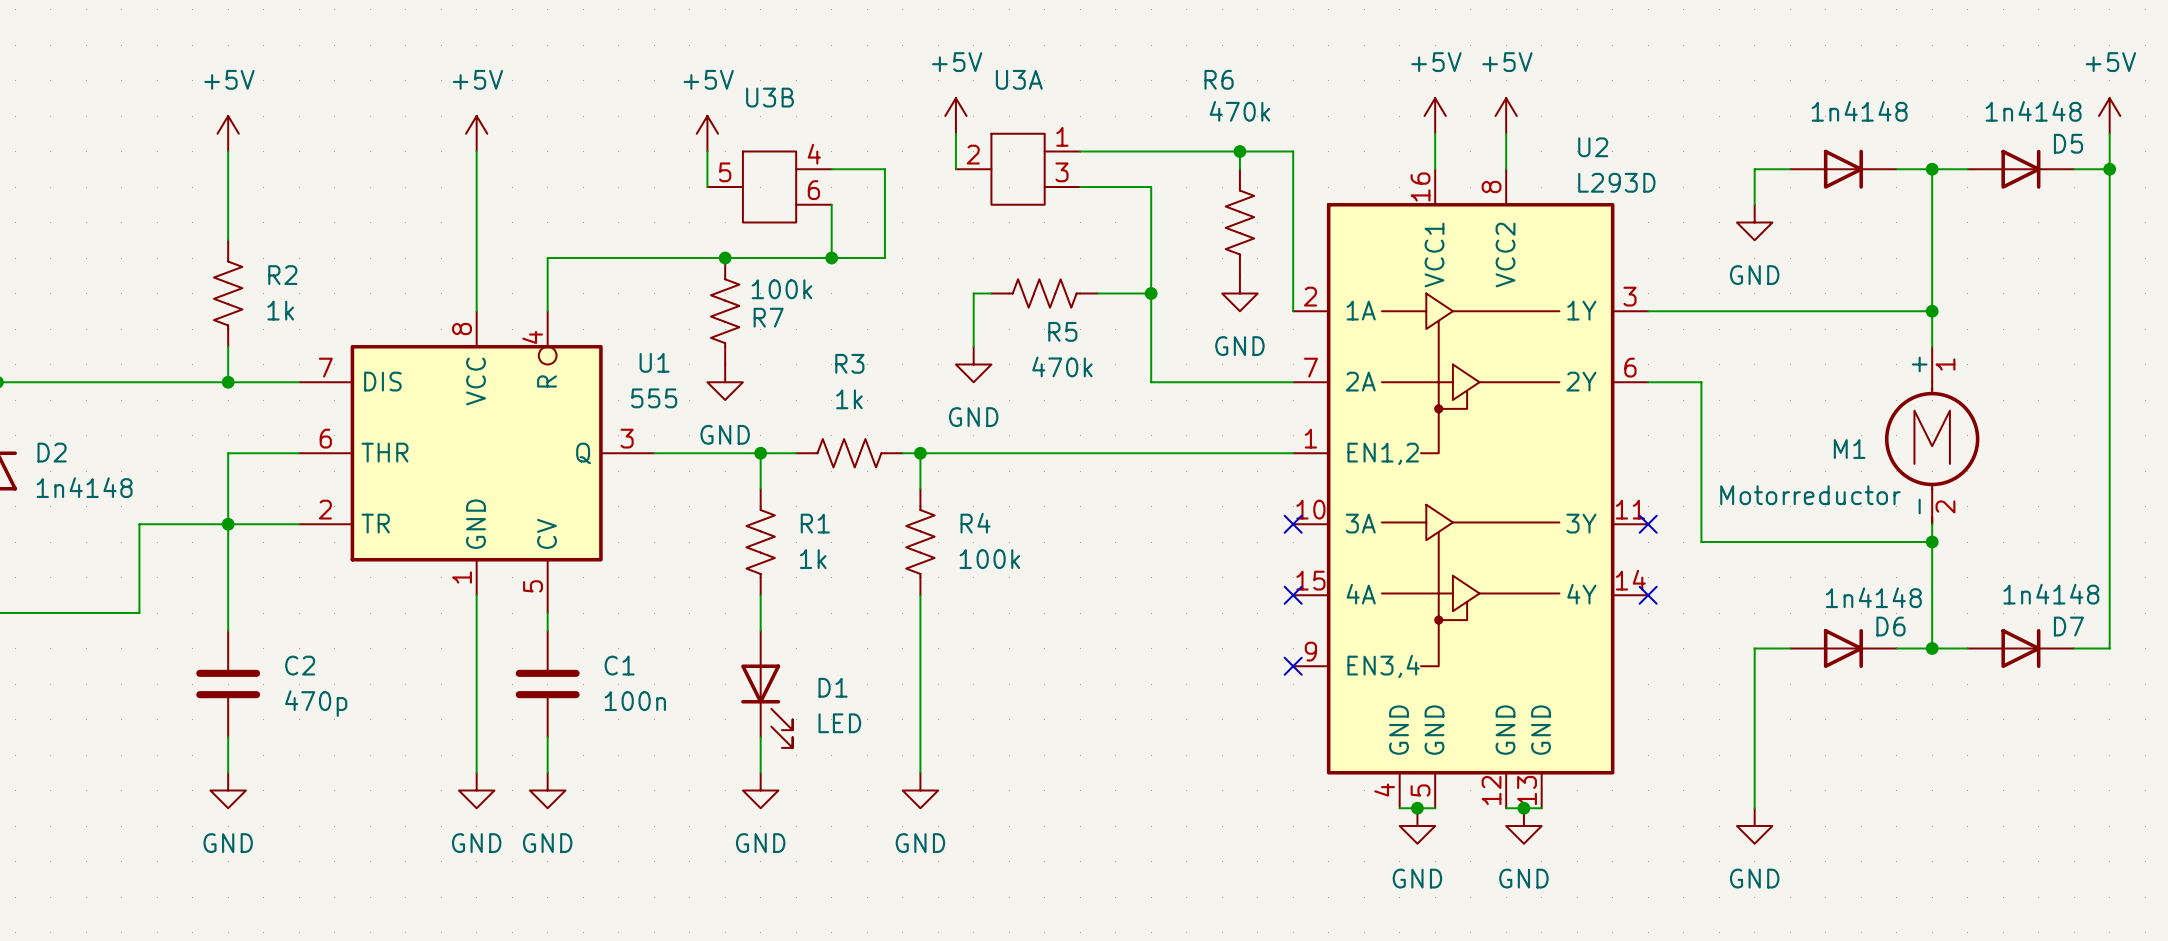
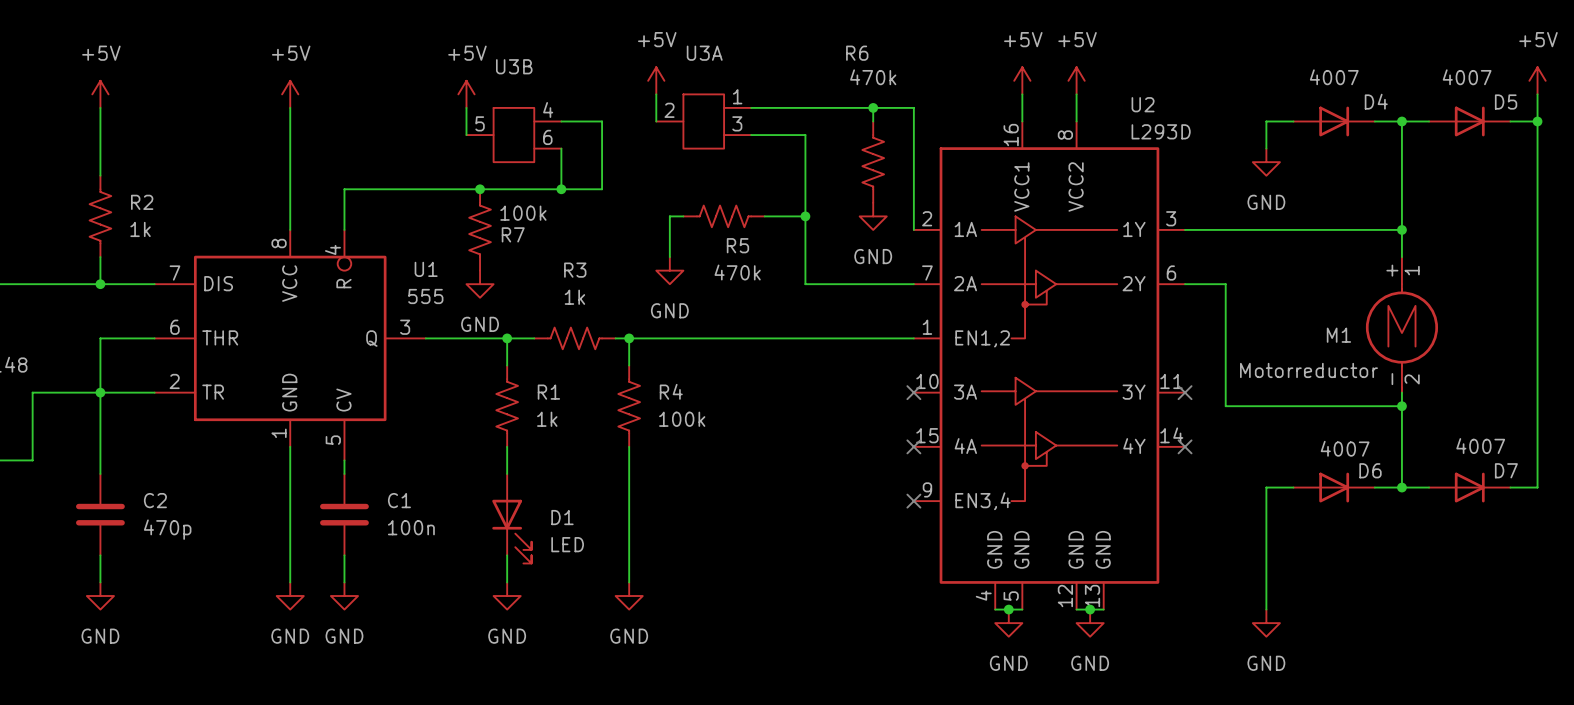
D4 value: 1n4148 (1859, 111) -> 4007 (1334, 77)
D5 value: 1n4148 (2033, 111) -> 4007 (1467, 77)
D4 name: none -> D4 (1376, 101)
D7 value: 1n4148 (2051, 594) -> 4007 (1480, 446)
D6 value: 1n4148 (1873, 597) -> 4007 (1345, 448)

